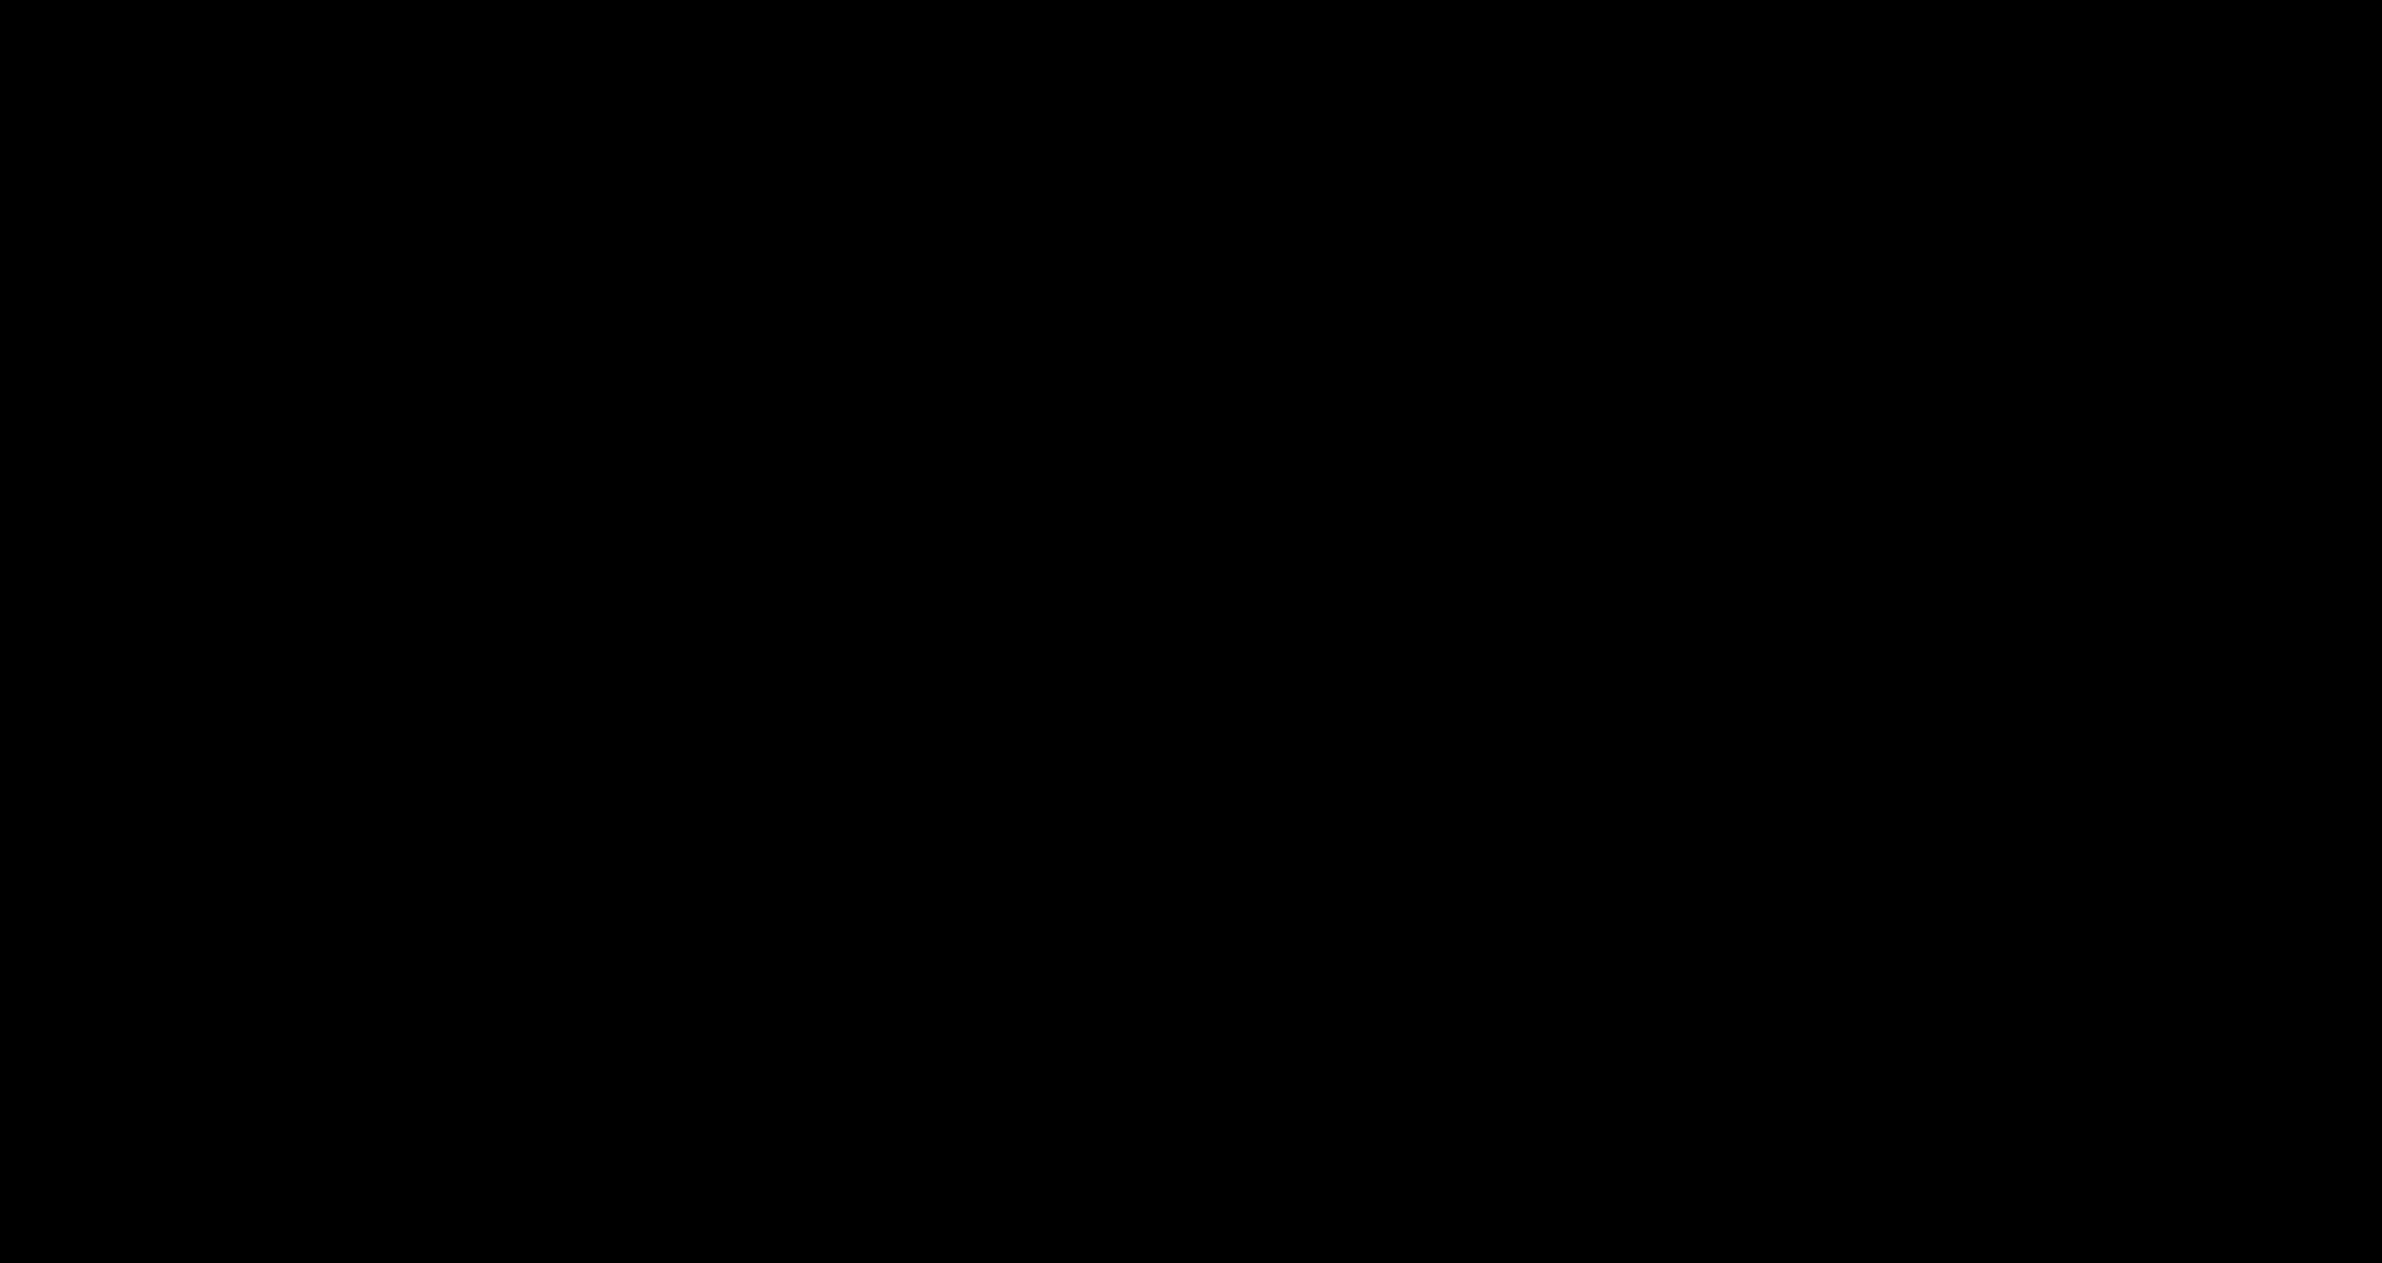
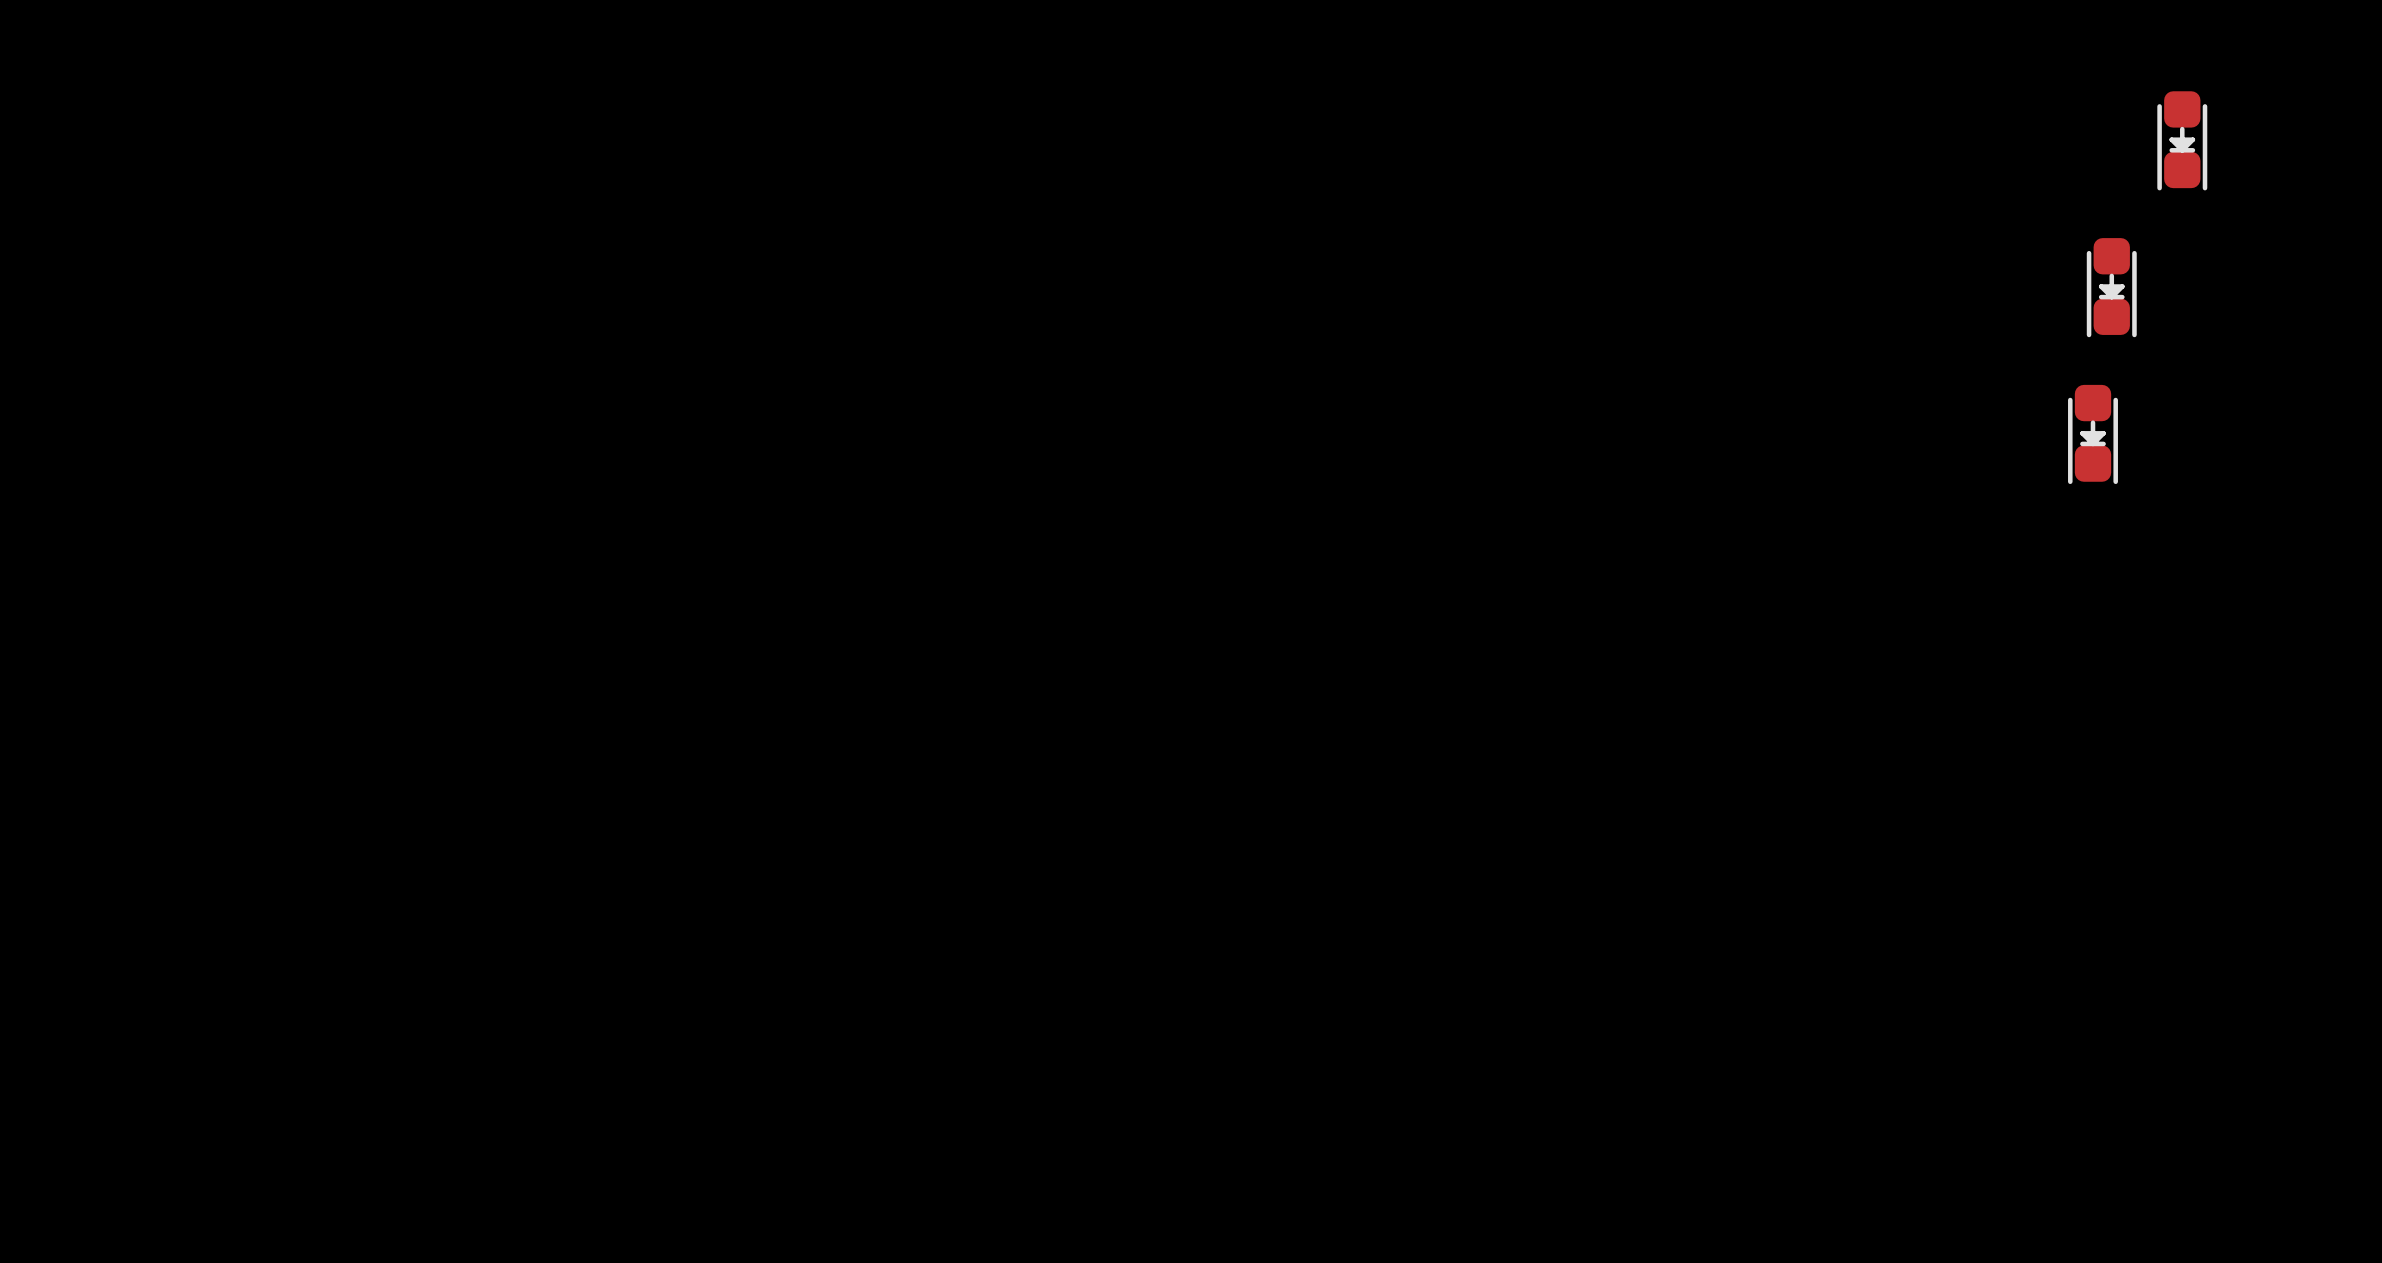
part: none -> (2182, 140)
part: none -> (2111, 287)
part: none -> (2092, 434)

